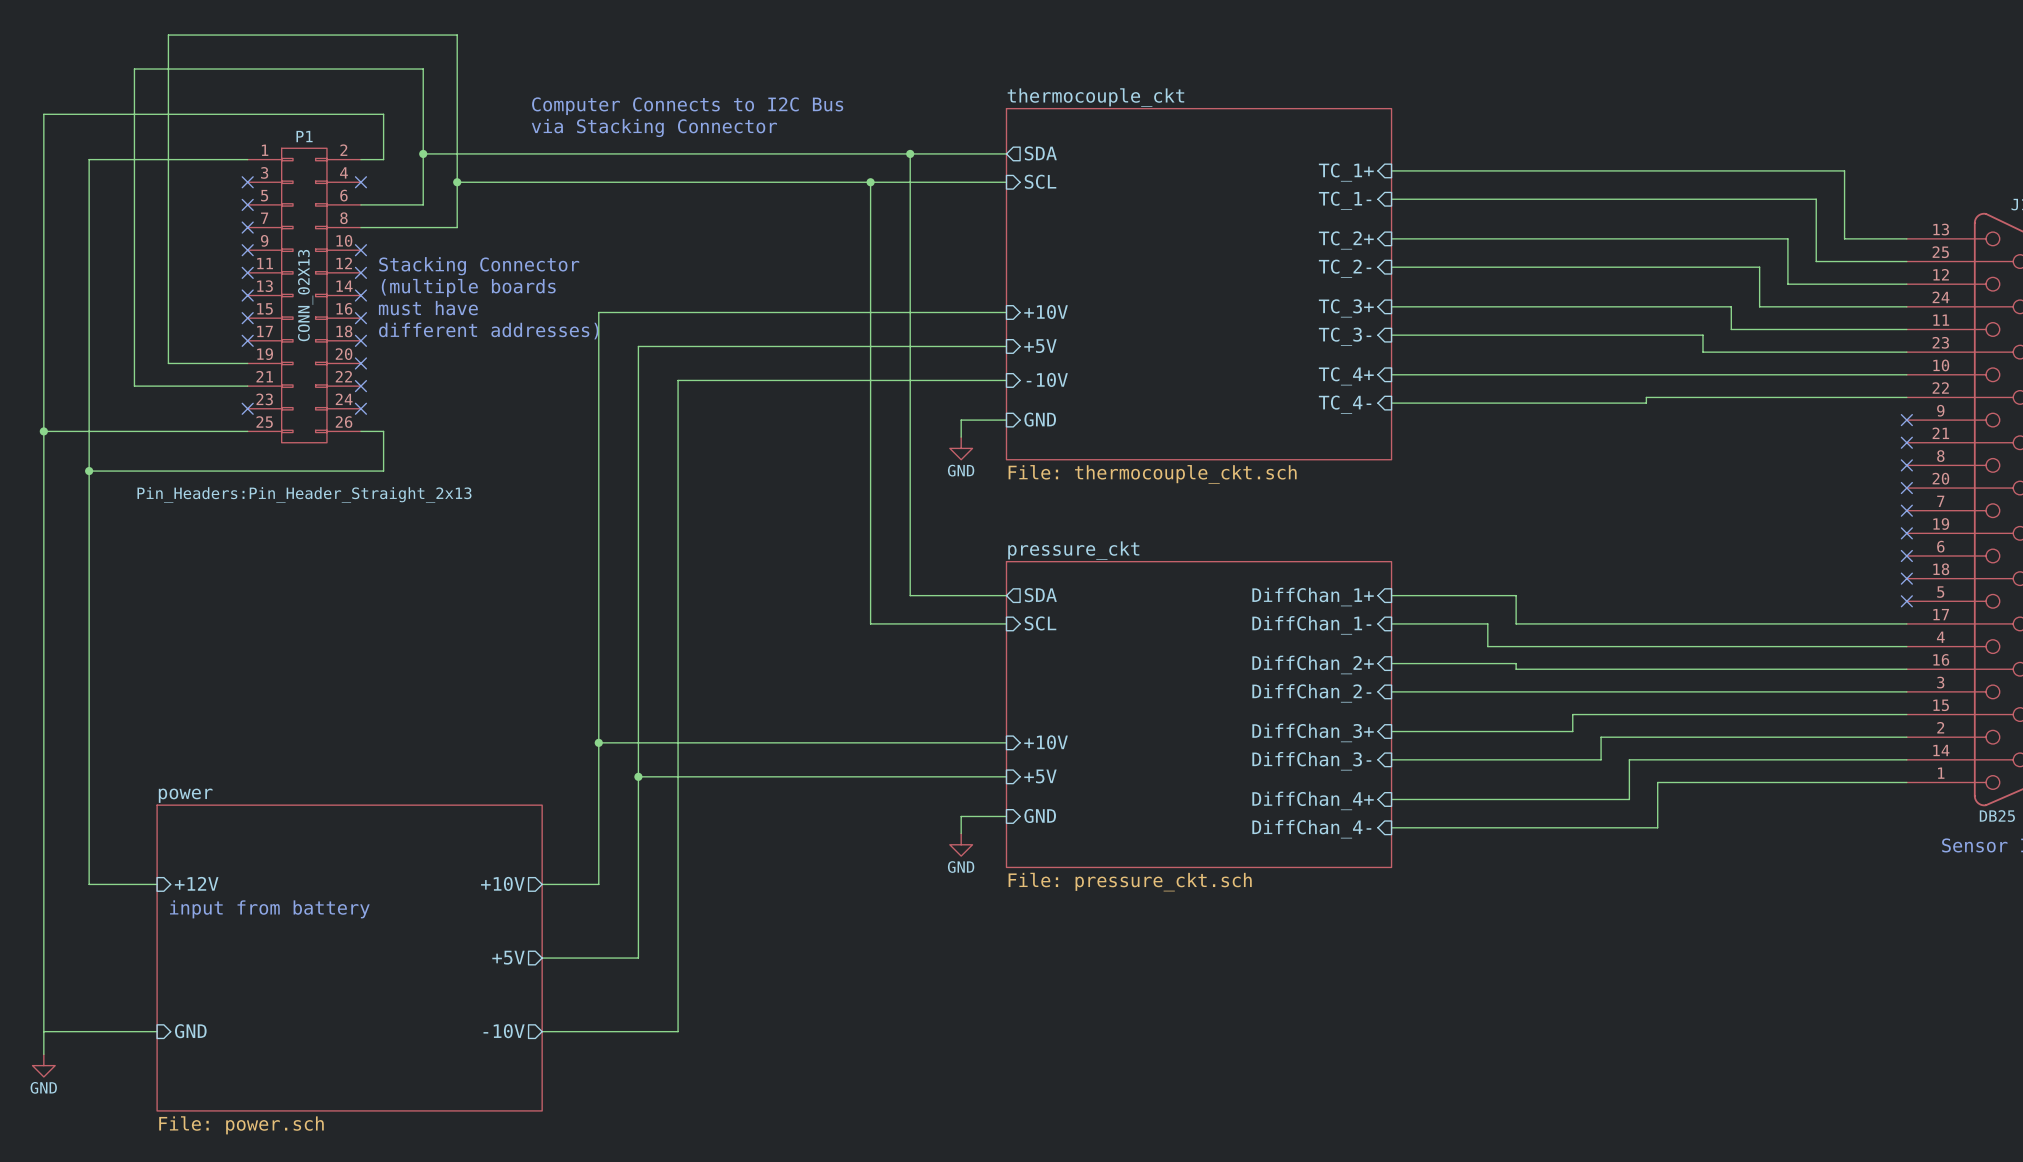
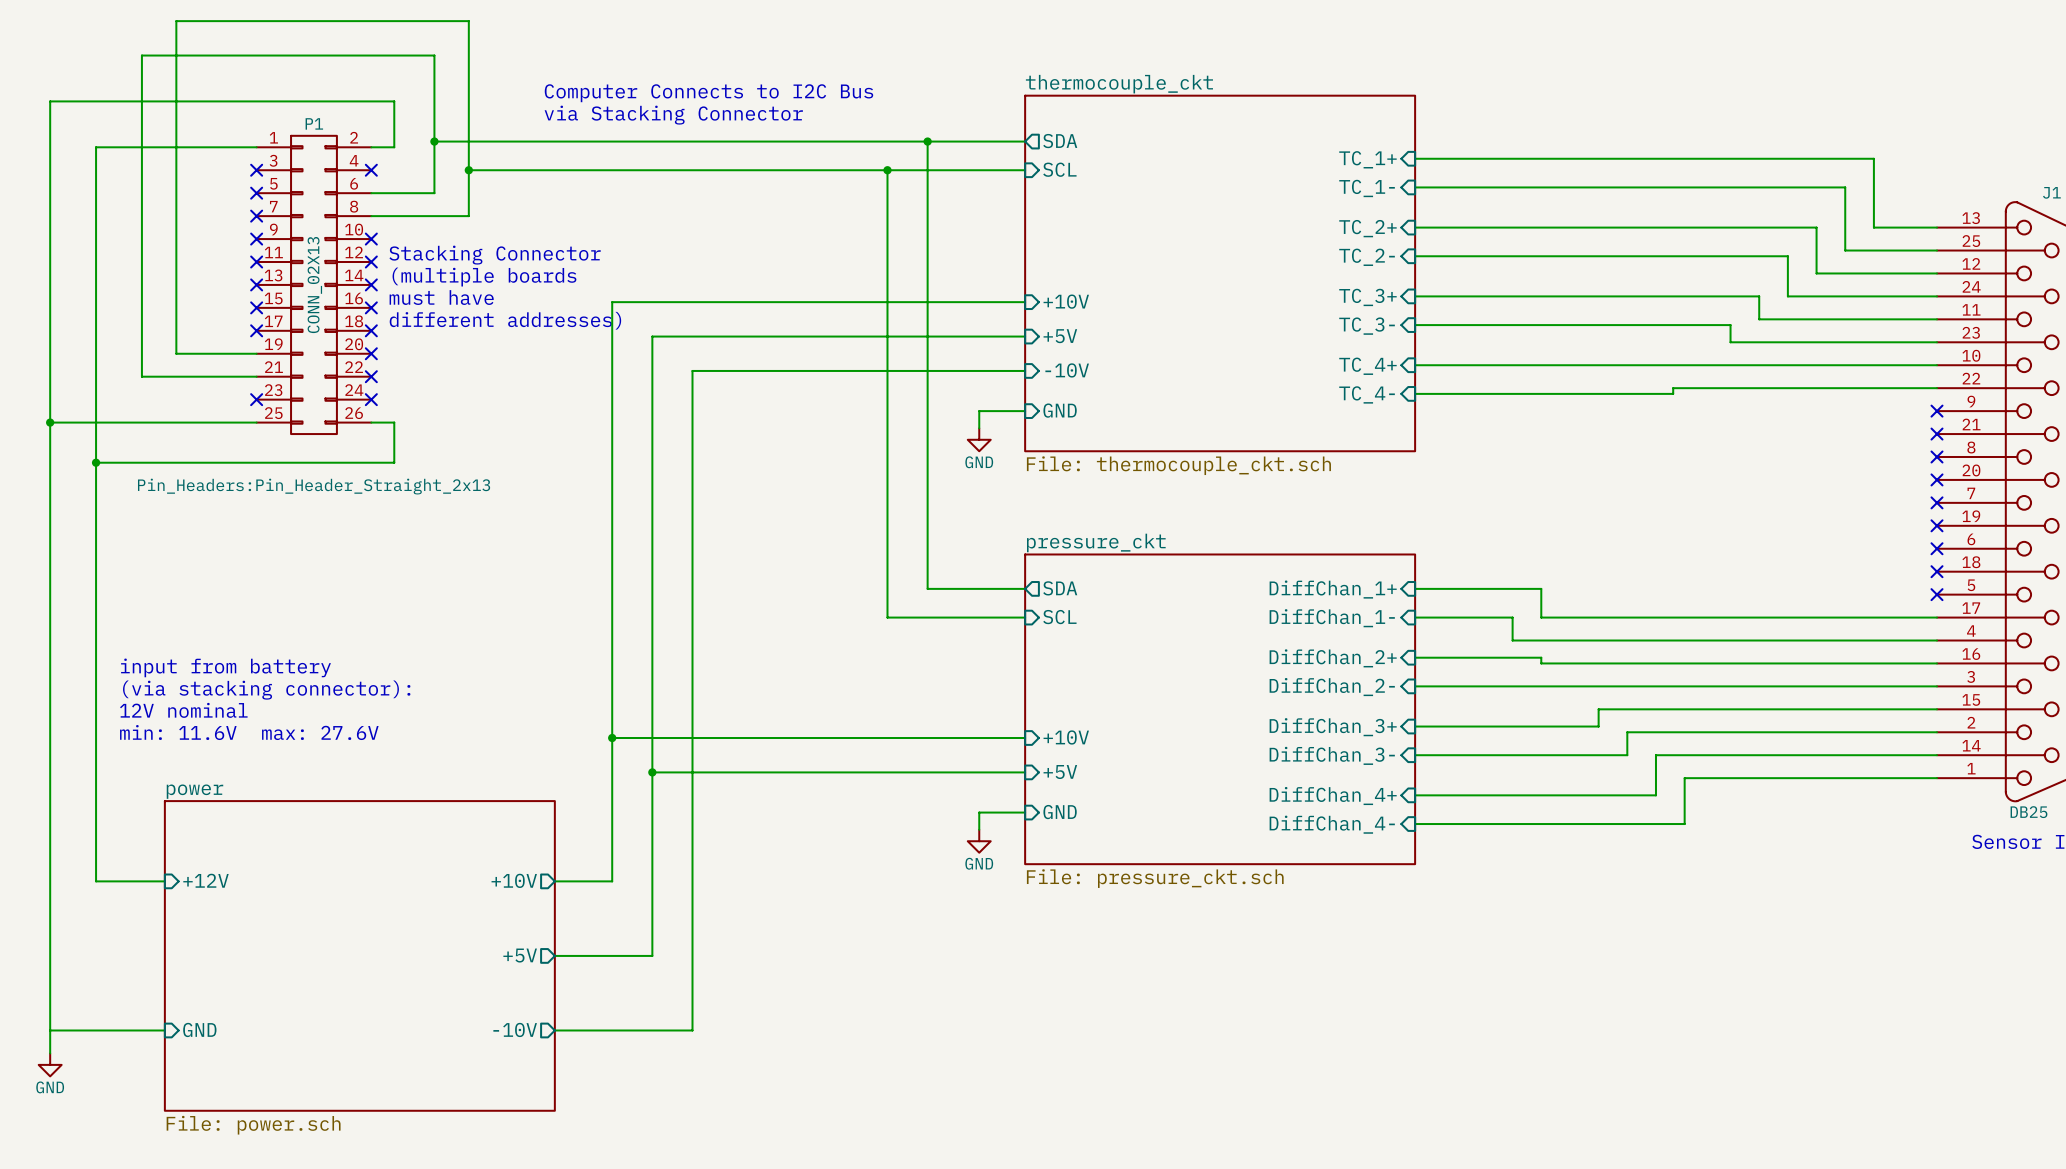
text: none -> input from battery (226, 667)
text: none -> (via stacking connector): (266, 690)
text: none -> 12V nominal (183, 710)
text: none -> min: 11.6V max: 27.6V (249, 732)
text: input from battery (269, 909) -> none

